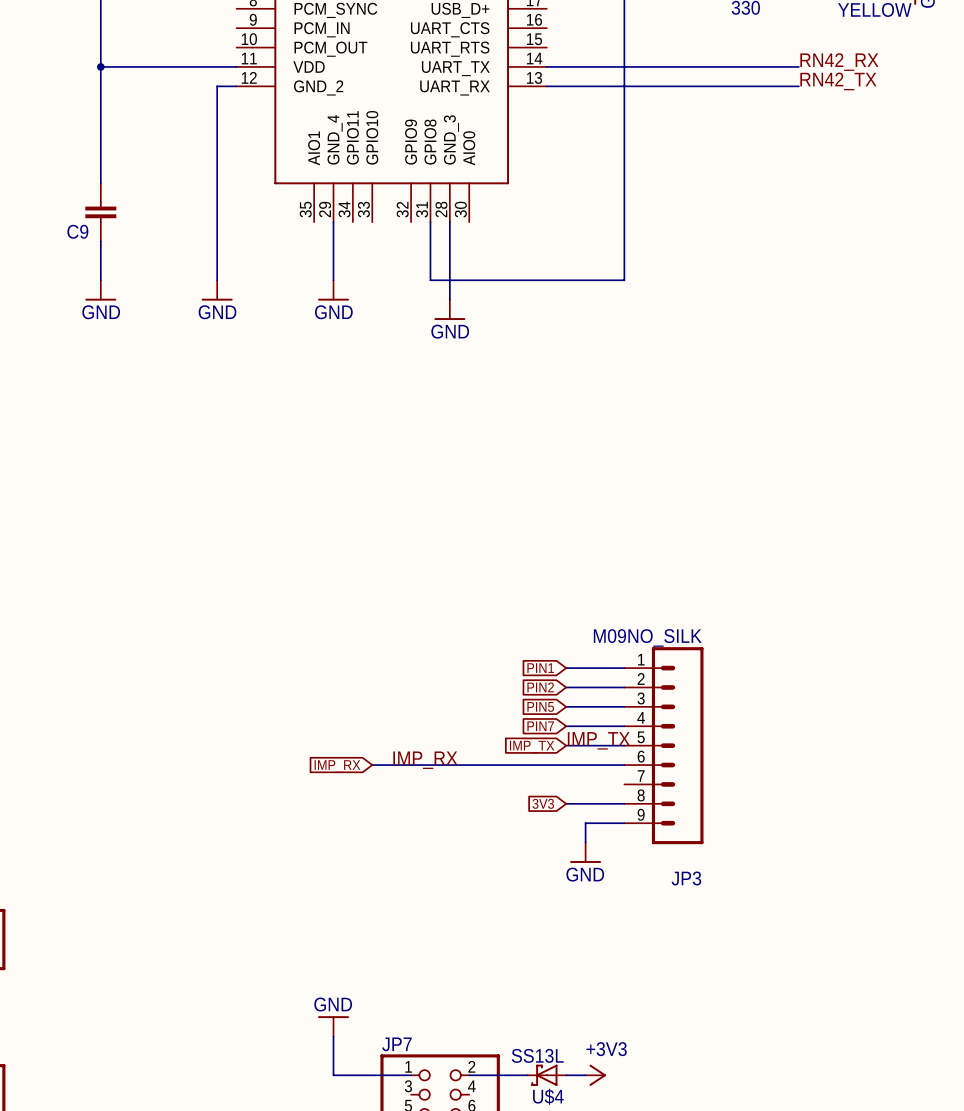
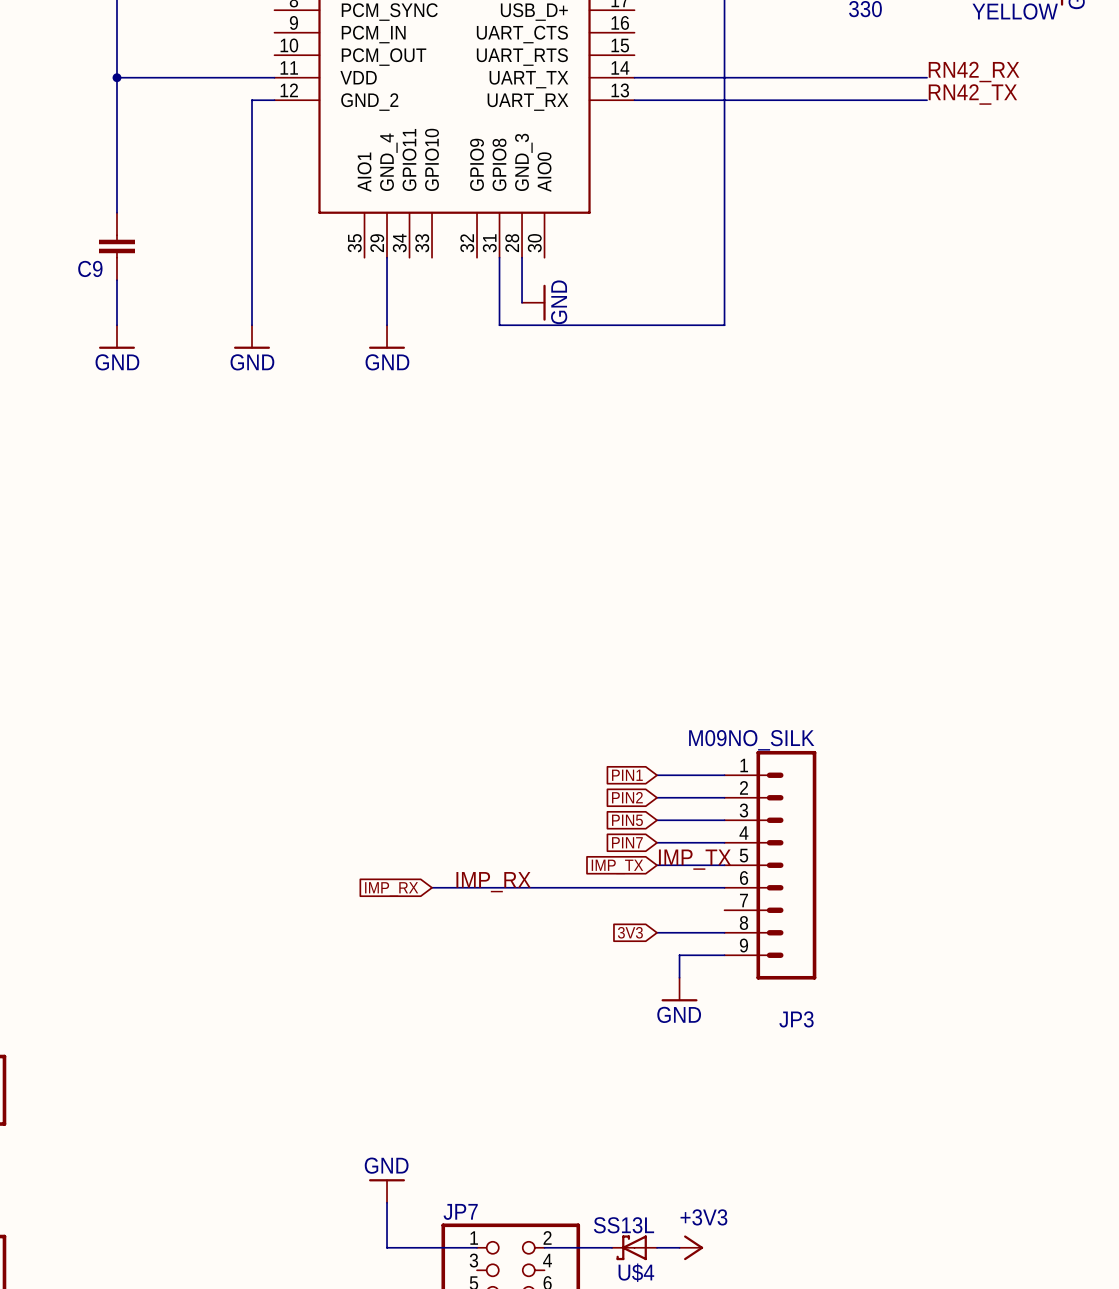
wire: (449, 260) (449, 299) -> none
power symbol position: GND (449, 309) -> GND (533, 302)
power symbol rotation: 0° (449, 319) -> 90° counterclockwise (544, 302)

